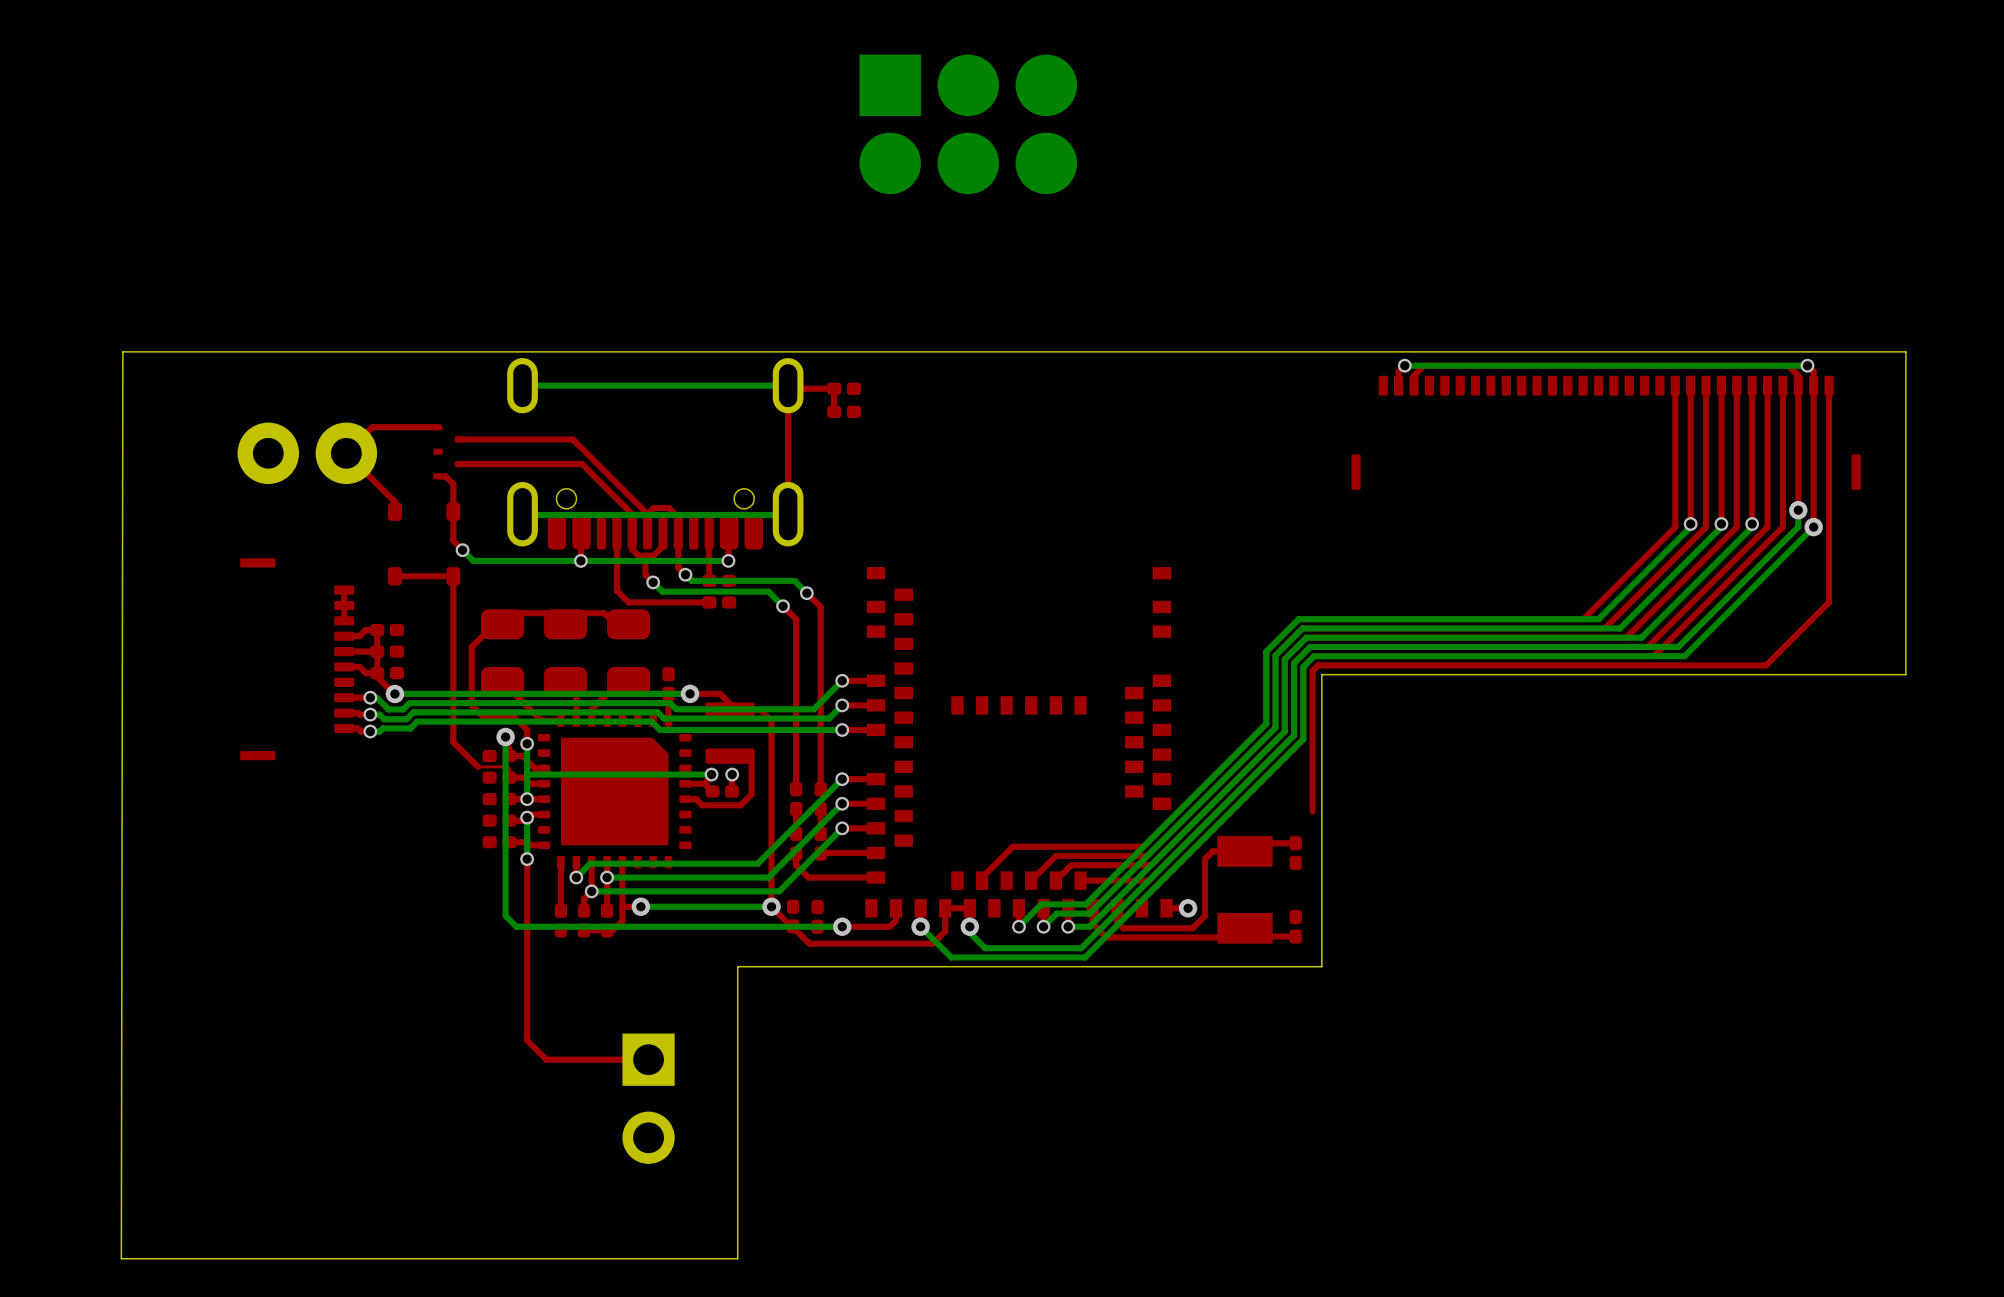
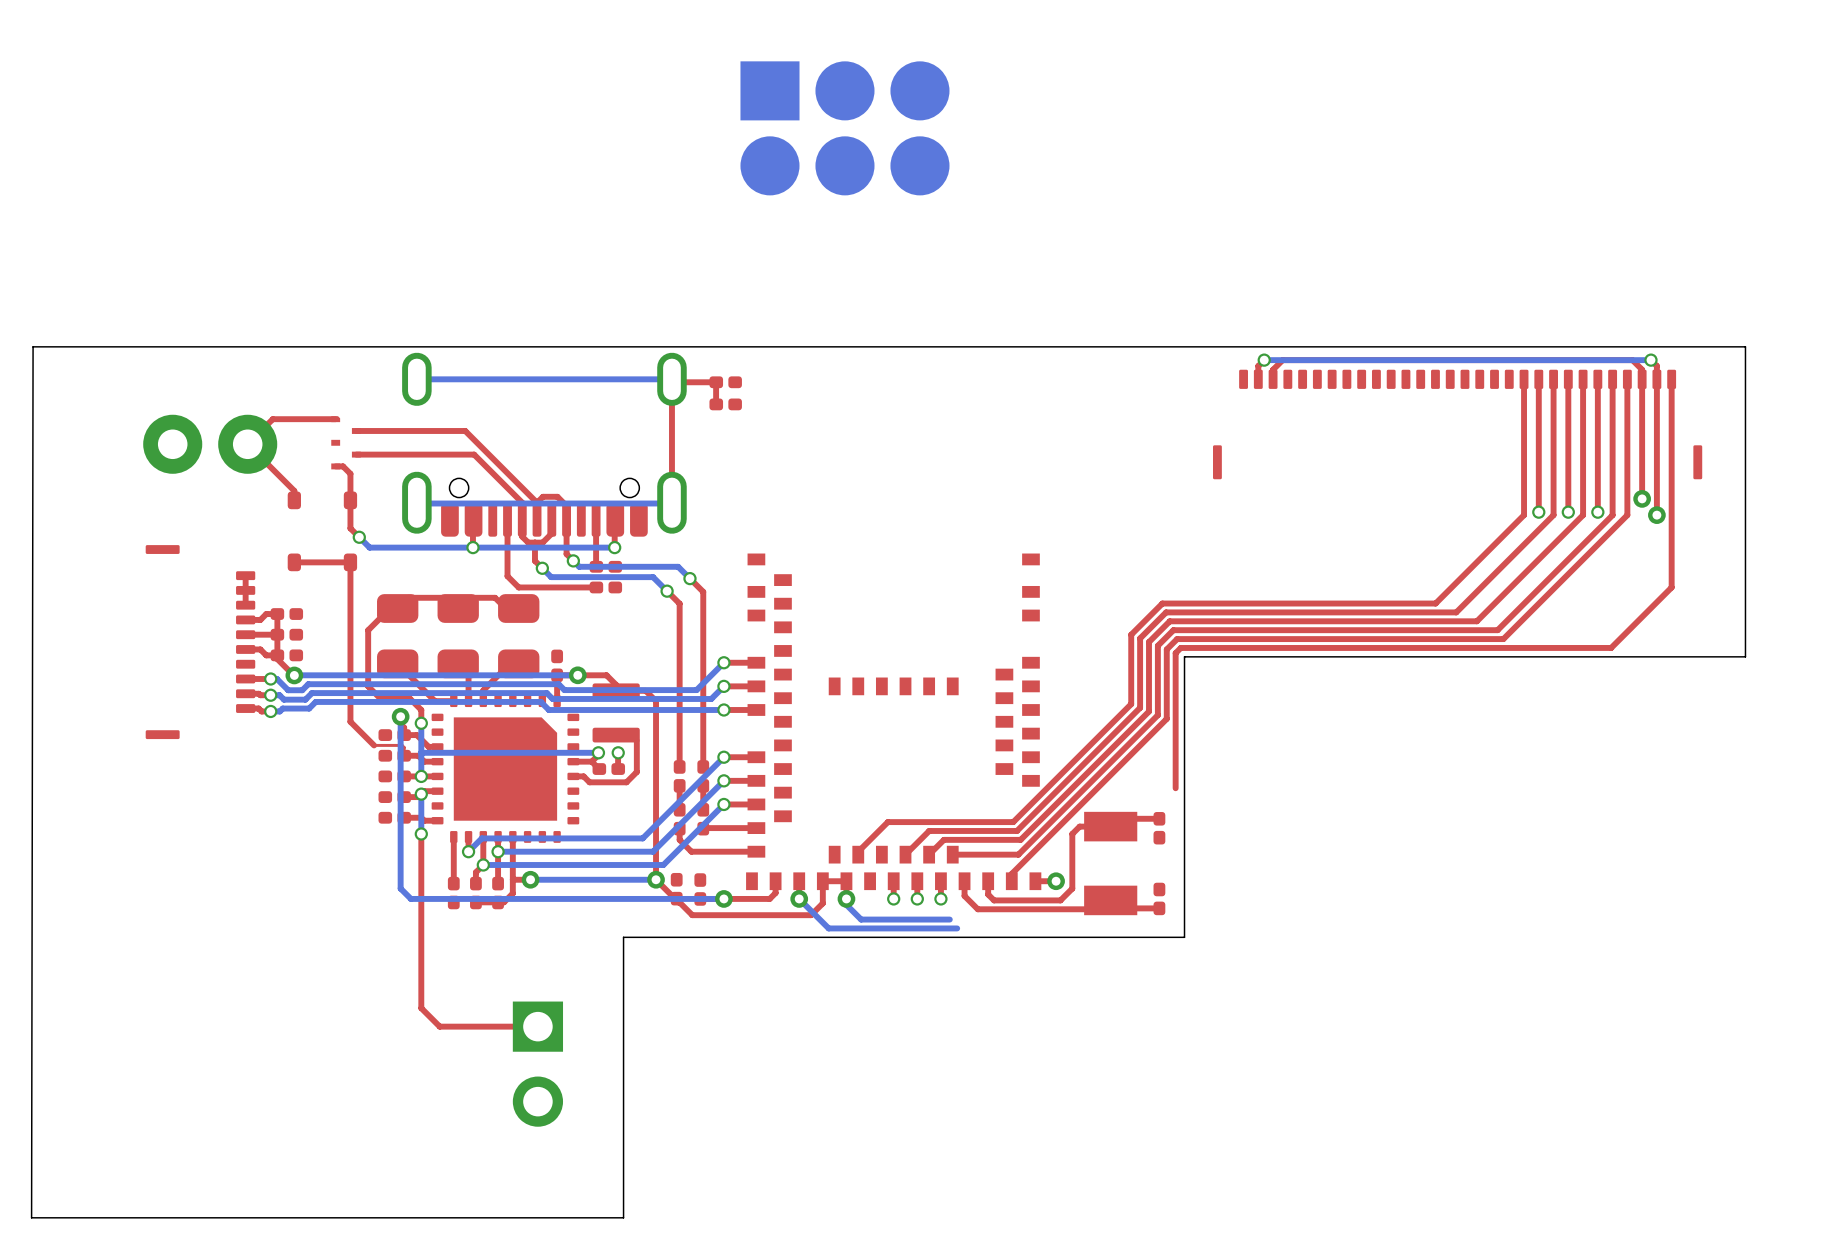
bottom track: (1798, 510) (1798, 527) (1678, 646) (1310, 646) (1294, 663) (1294, 735) (1081, 948) (1077, 948) -> none
bottom track: (1690, 524) (1690, 527) (1598, 619) (1298, 619) (1266, 651) (1266, 723) (1085, 904) (1041, 904) (1019, 926) -> none
bottom track: (1721, 524) (1721, 527) (1620, 628) (1302, 628) (1275, 655) (1275, 727) (1089, 913) (1056, 913) (1043, 926) -> none
bottom track: (1752, 524) (1752, 527) (1641, 637) (1306, 637) (1284, 659) (1284, 731) (1089, 926) (1068, 926) -> none
bottom track: (1813, 527) (1684, 656) (1314, 656) (1303, 666) (1303, 739) (1085, 957) -> none

